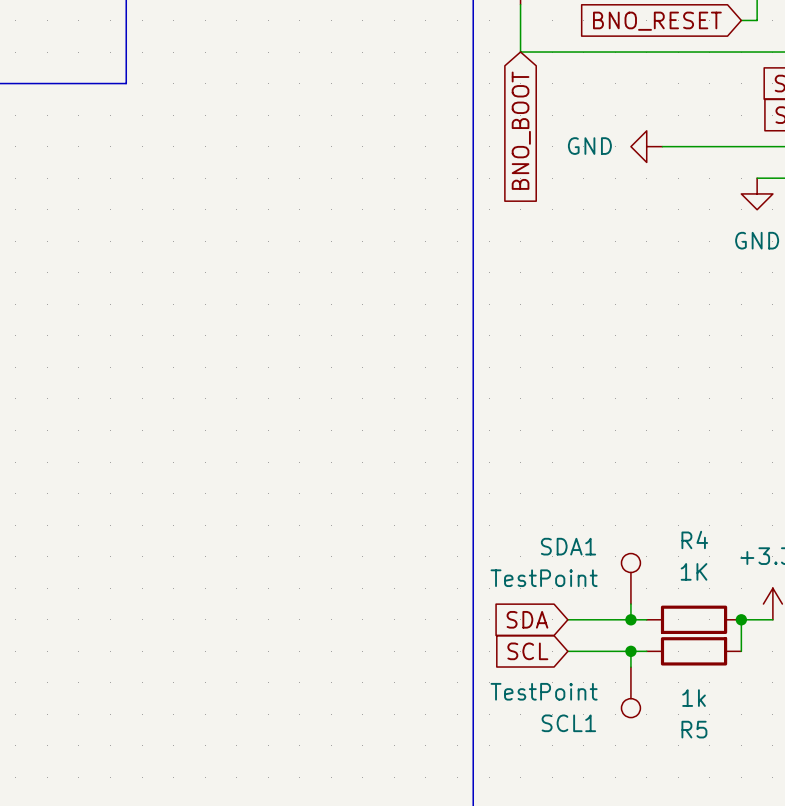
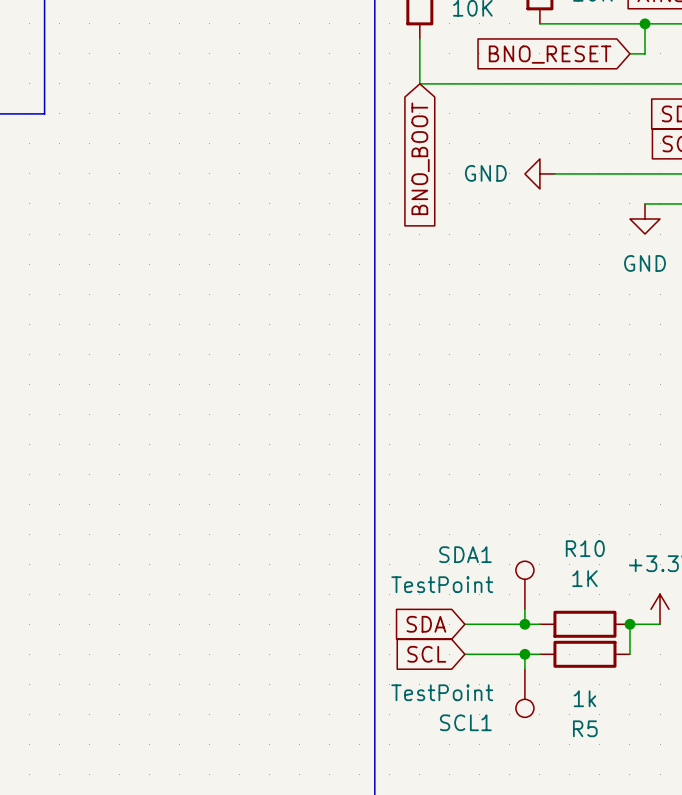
R4 name: R4 (694, 539) -> R10 (585, 548)

